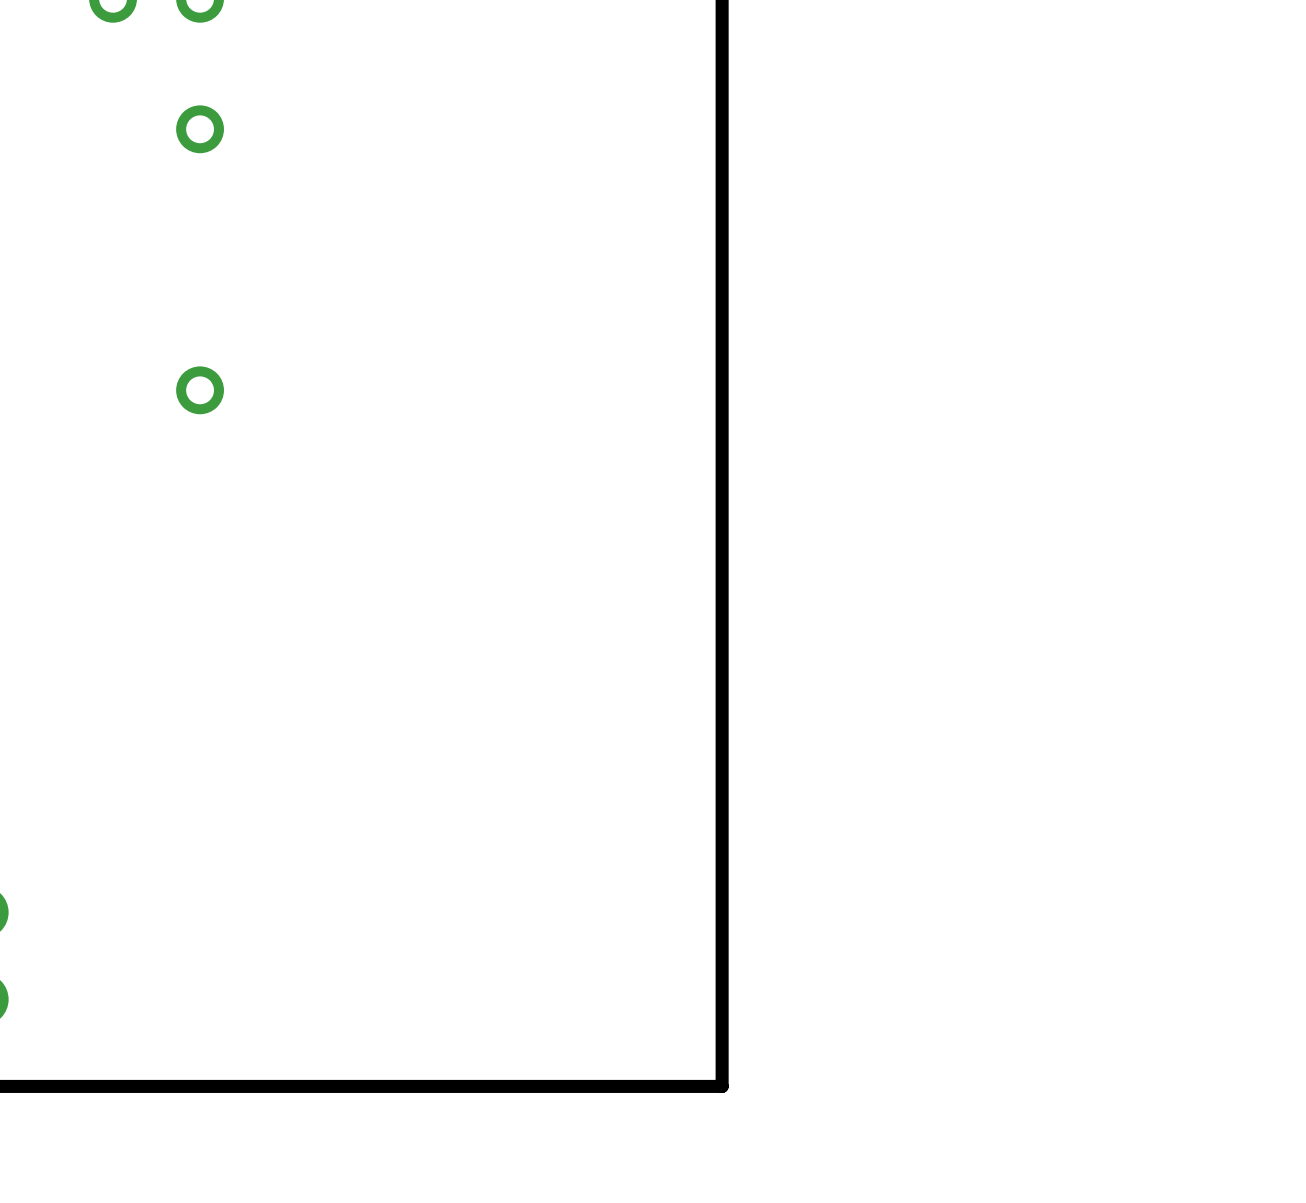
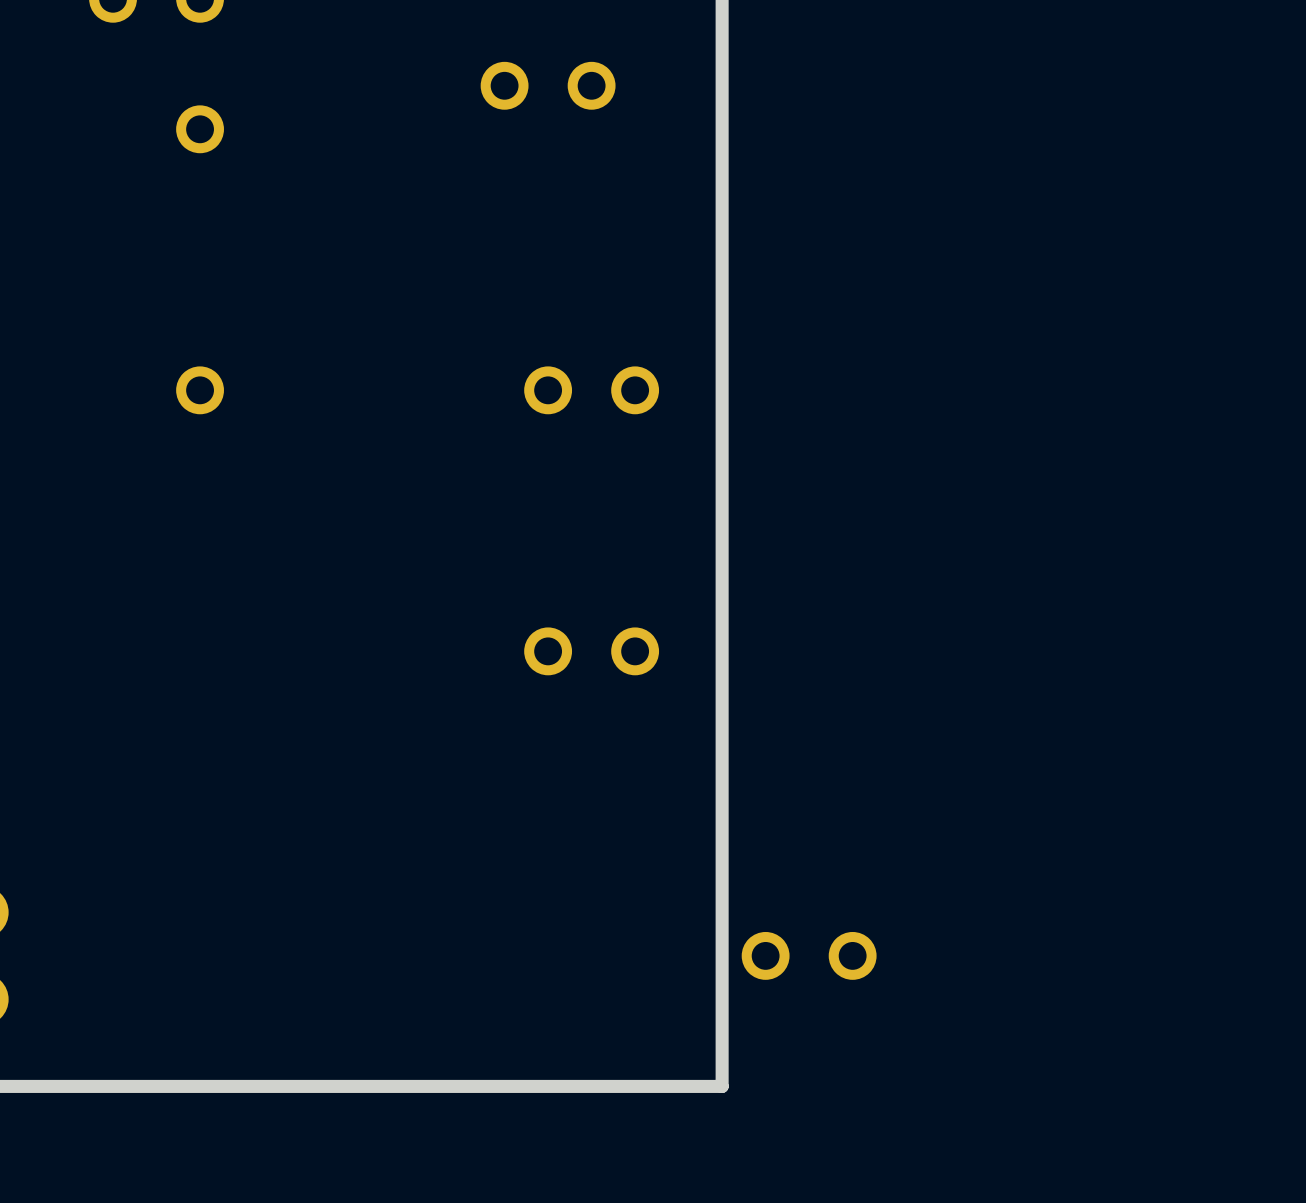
part: none -> (548, 85)
part: none -> (591, 390)
part: none -> (591, 651)
part: none -> (809, 955)

